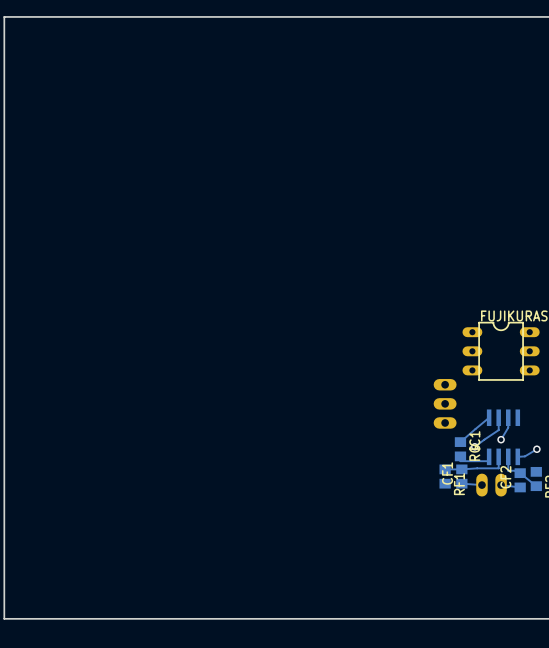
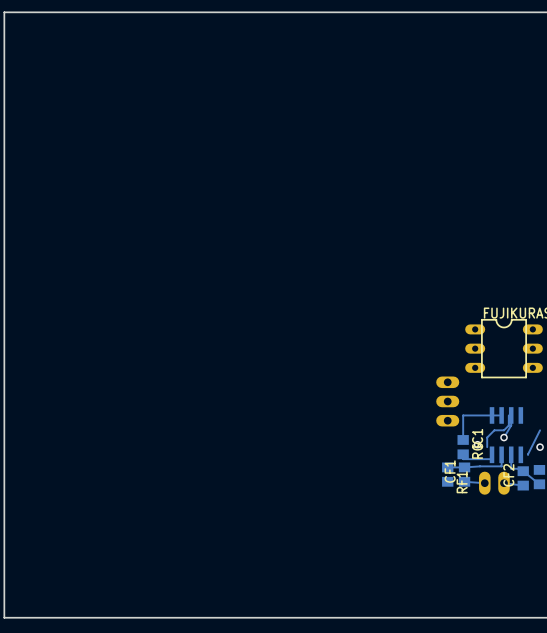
track: (489, 417) (460, 442) -> (499, 415) (463, 415) (463, 439)
track: (498, 417) (498, 430) (474, 446) -> none
track: none -> (508, 415) (508, 425) (504, 430) (494, 430) (487, 437) (487, 447)
track: none -> (540, 430) (528, 454)
track: (536, 449) (524, 456) (517, 456) -> none

